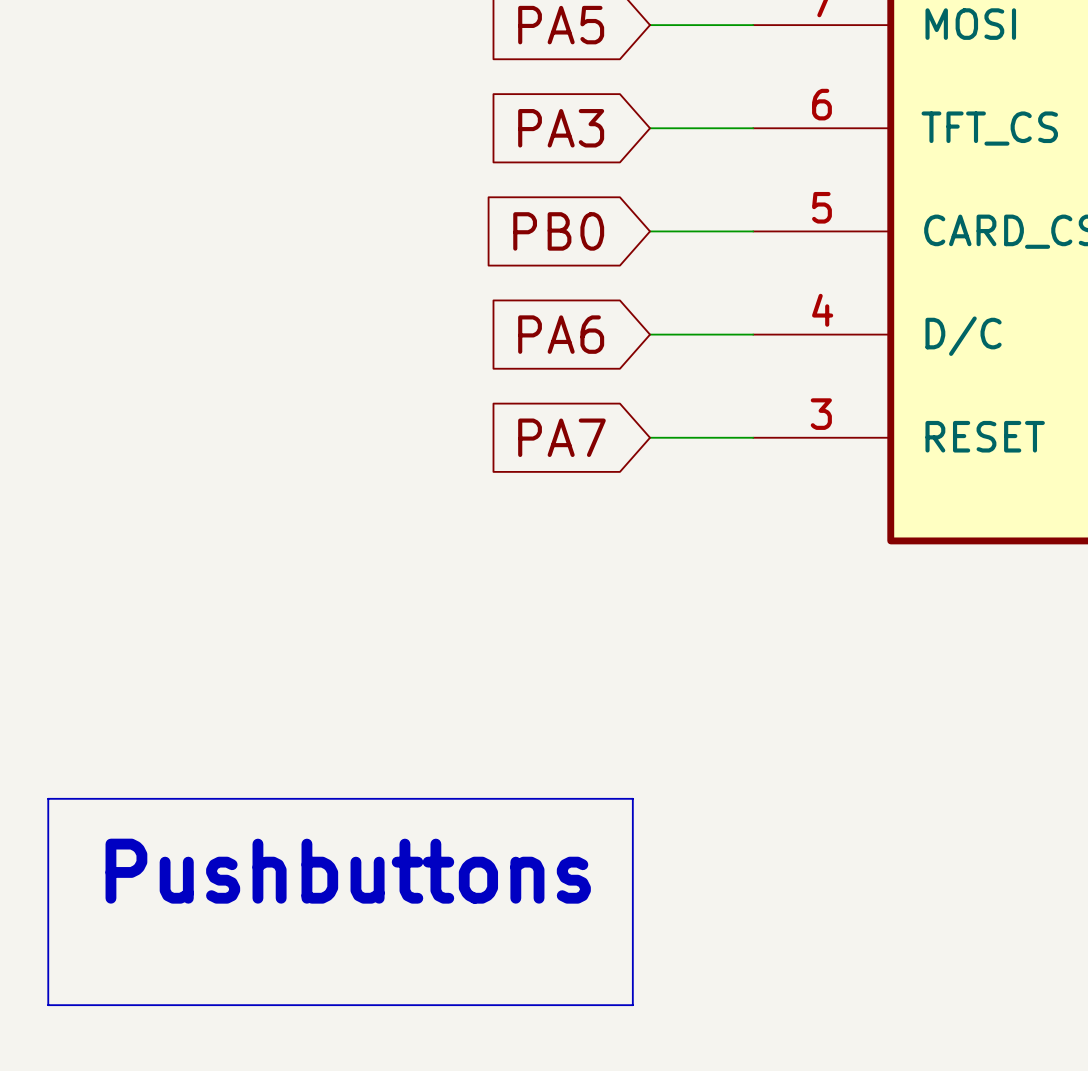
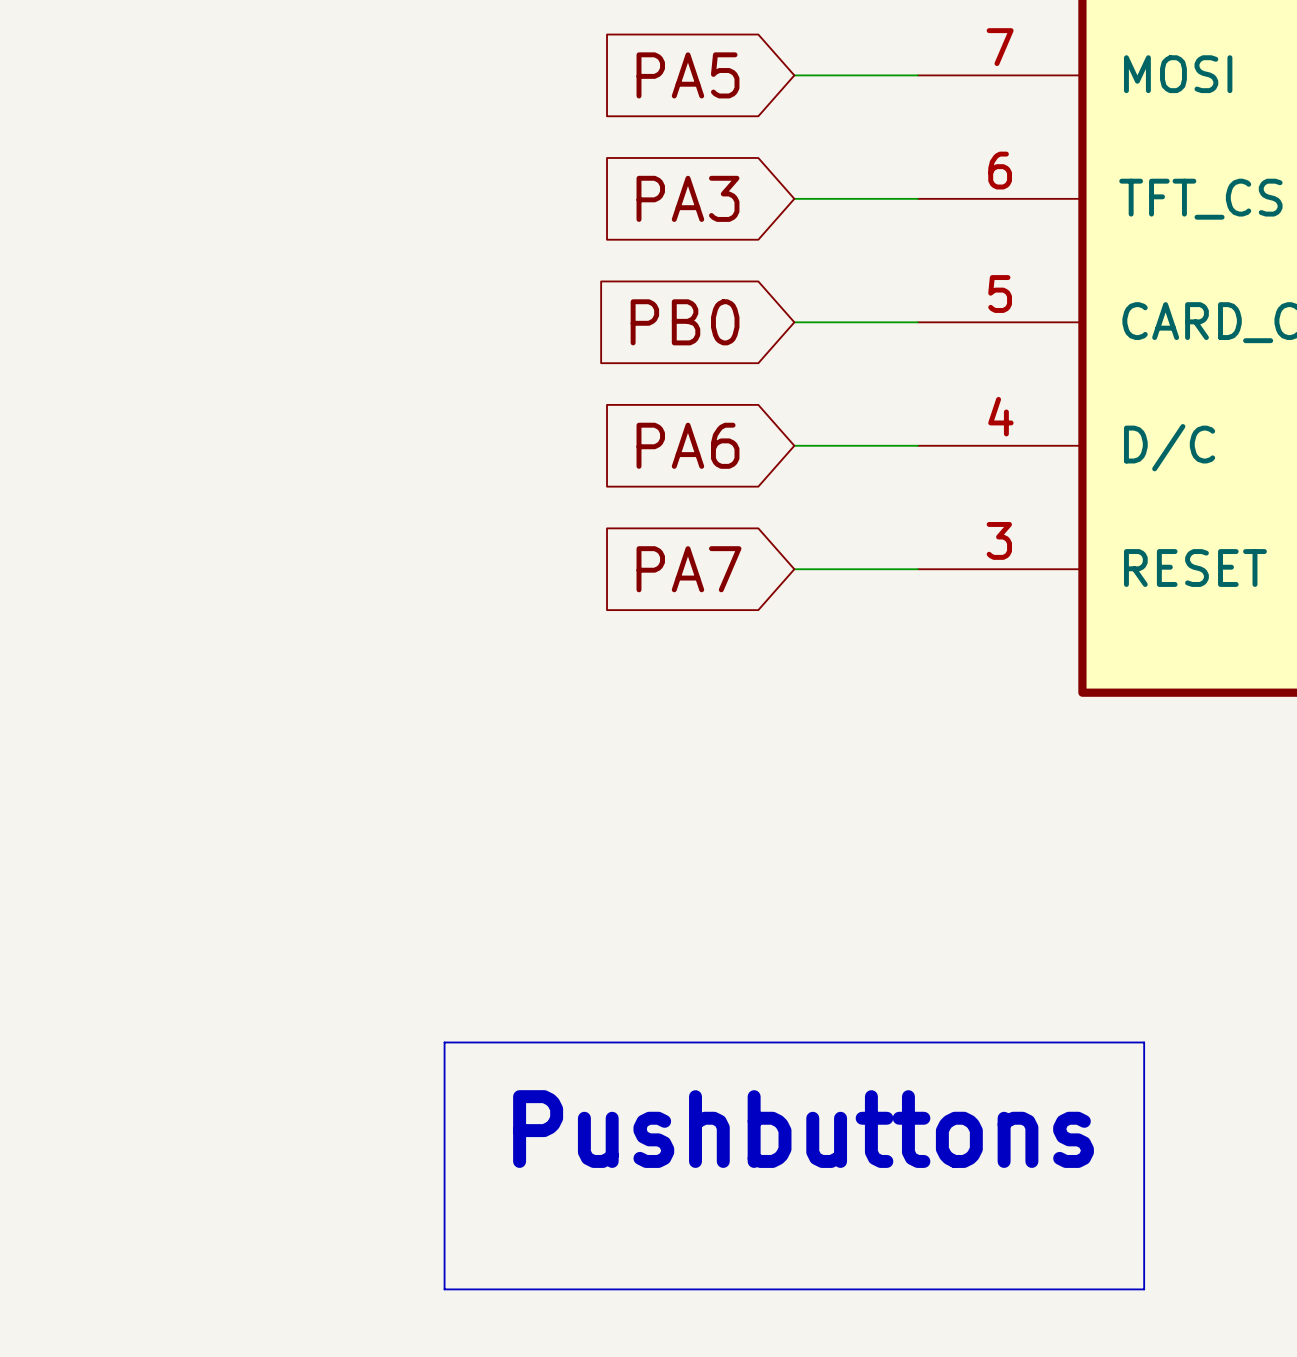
line: (48, 798) (632, 798) (632, 1005) (48, 1005) (48, 798) -> (444, 1042) (1144, 1042) (1144, 1289) (444, 1289) (444, 1042)
text position: Pushbuttons (348, 871) -> Pushbuttons (803, 1129)

